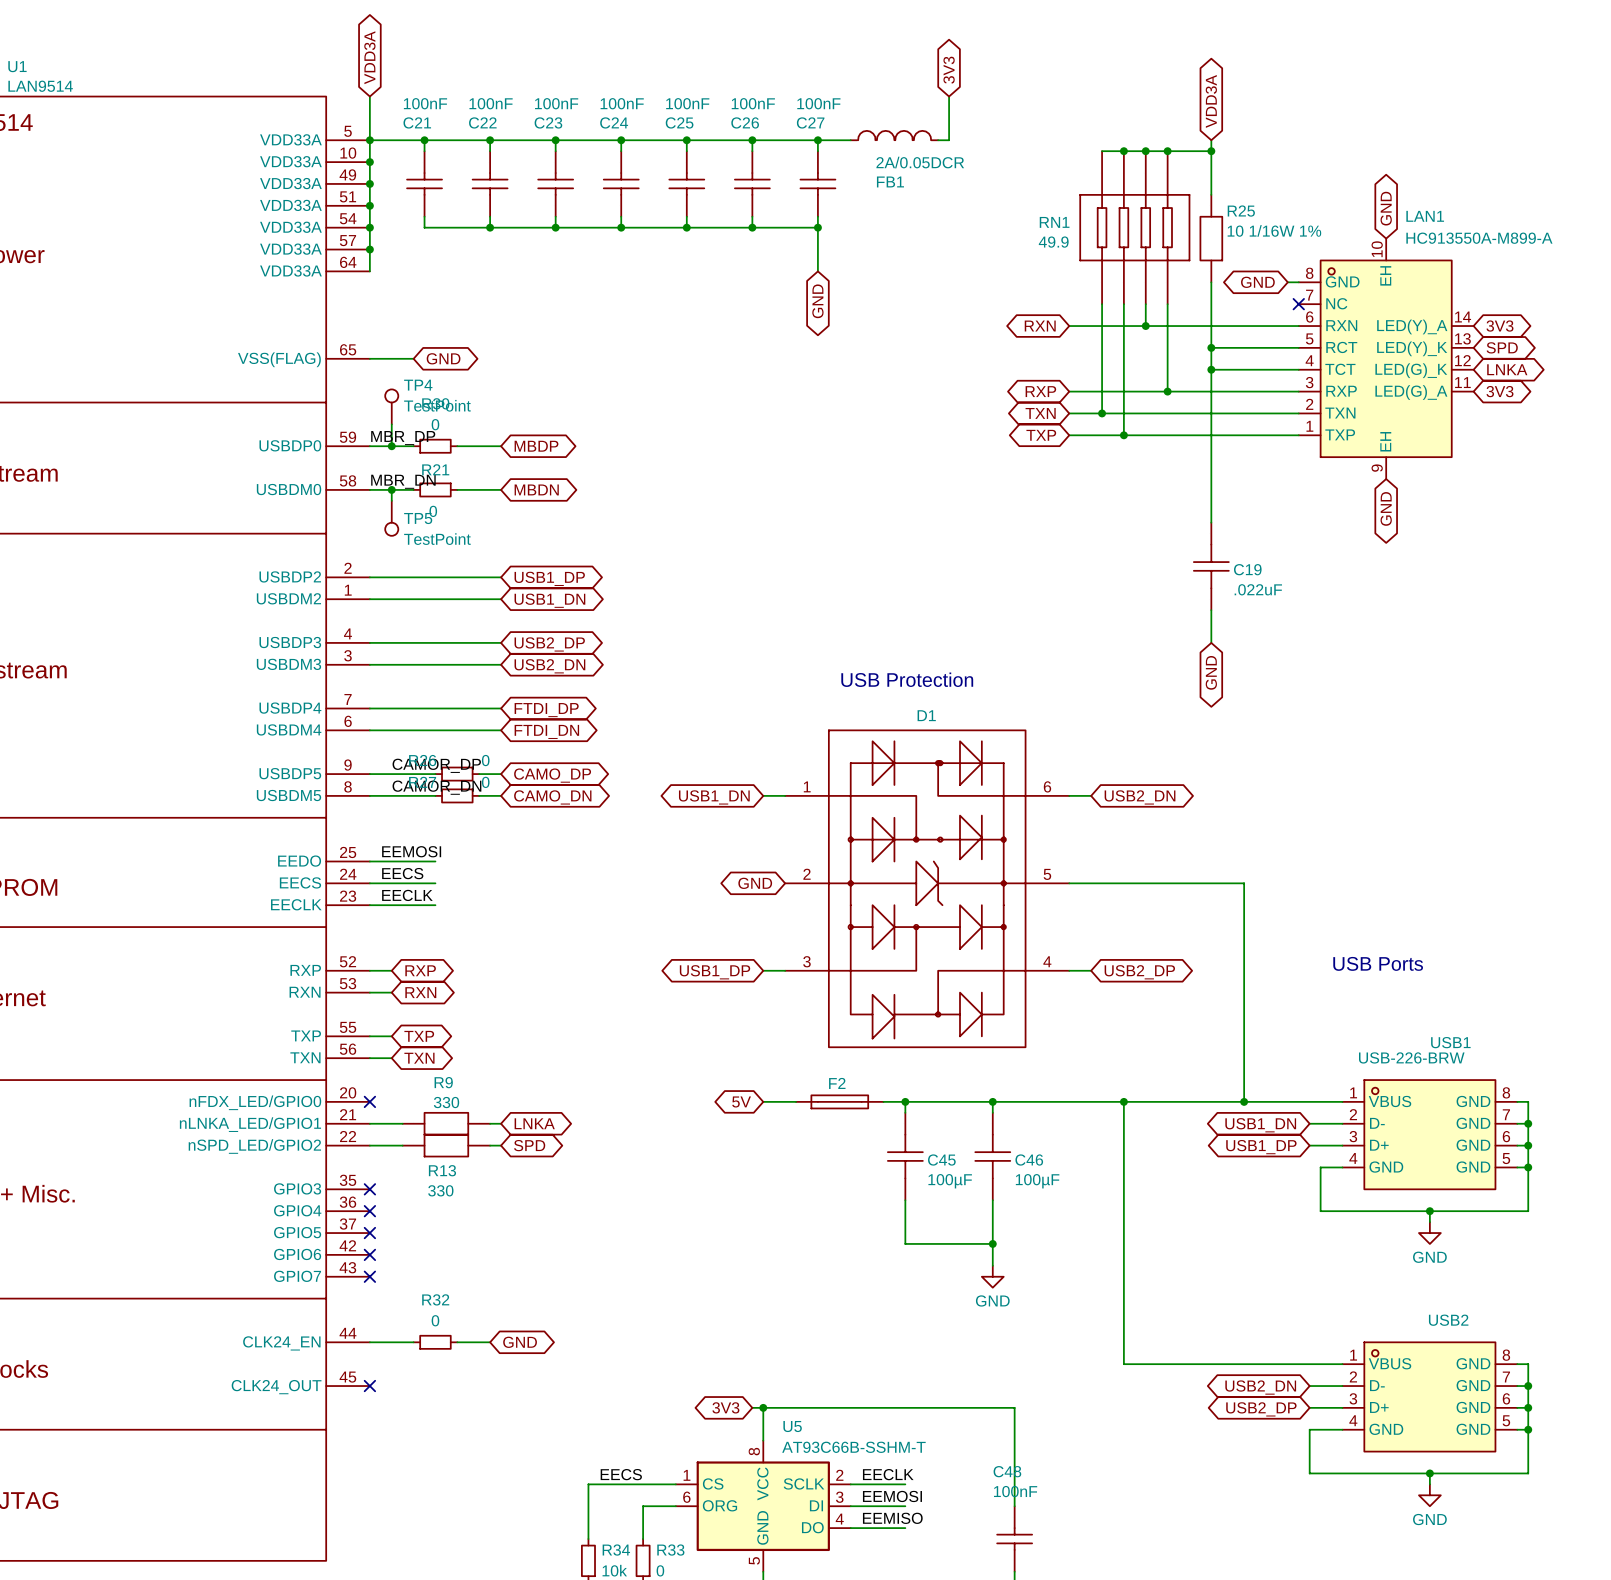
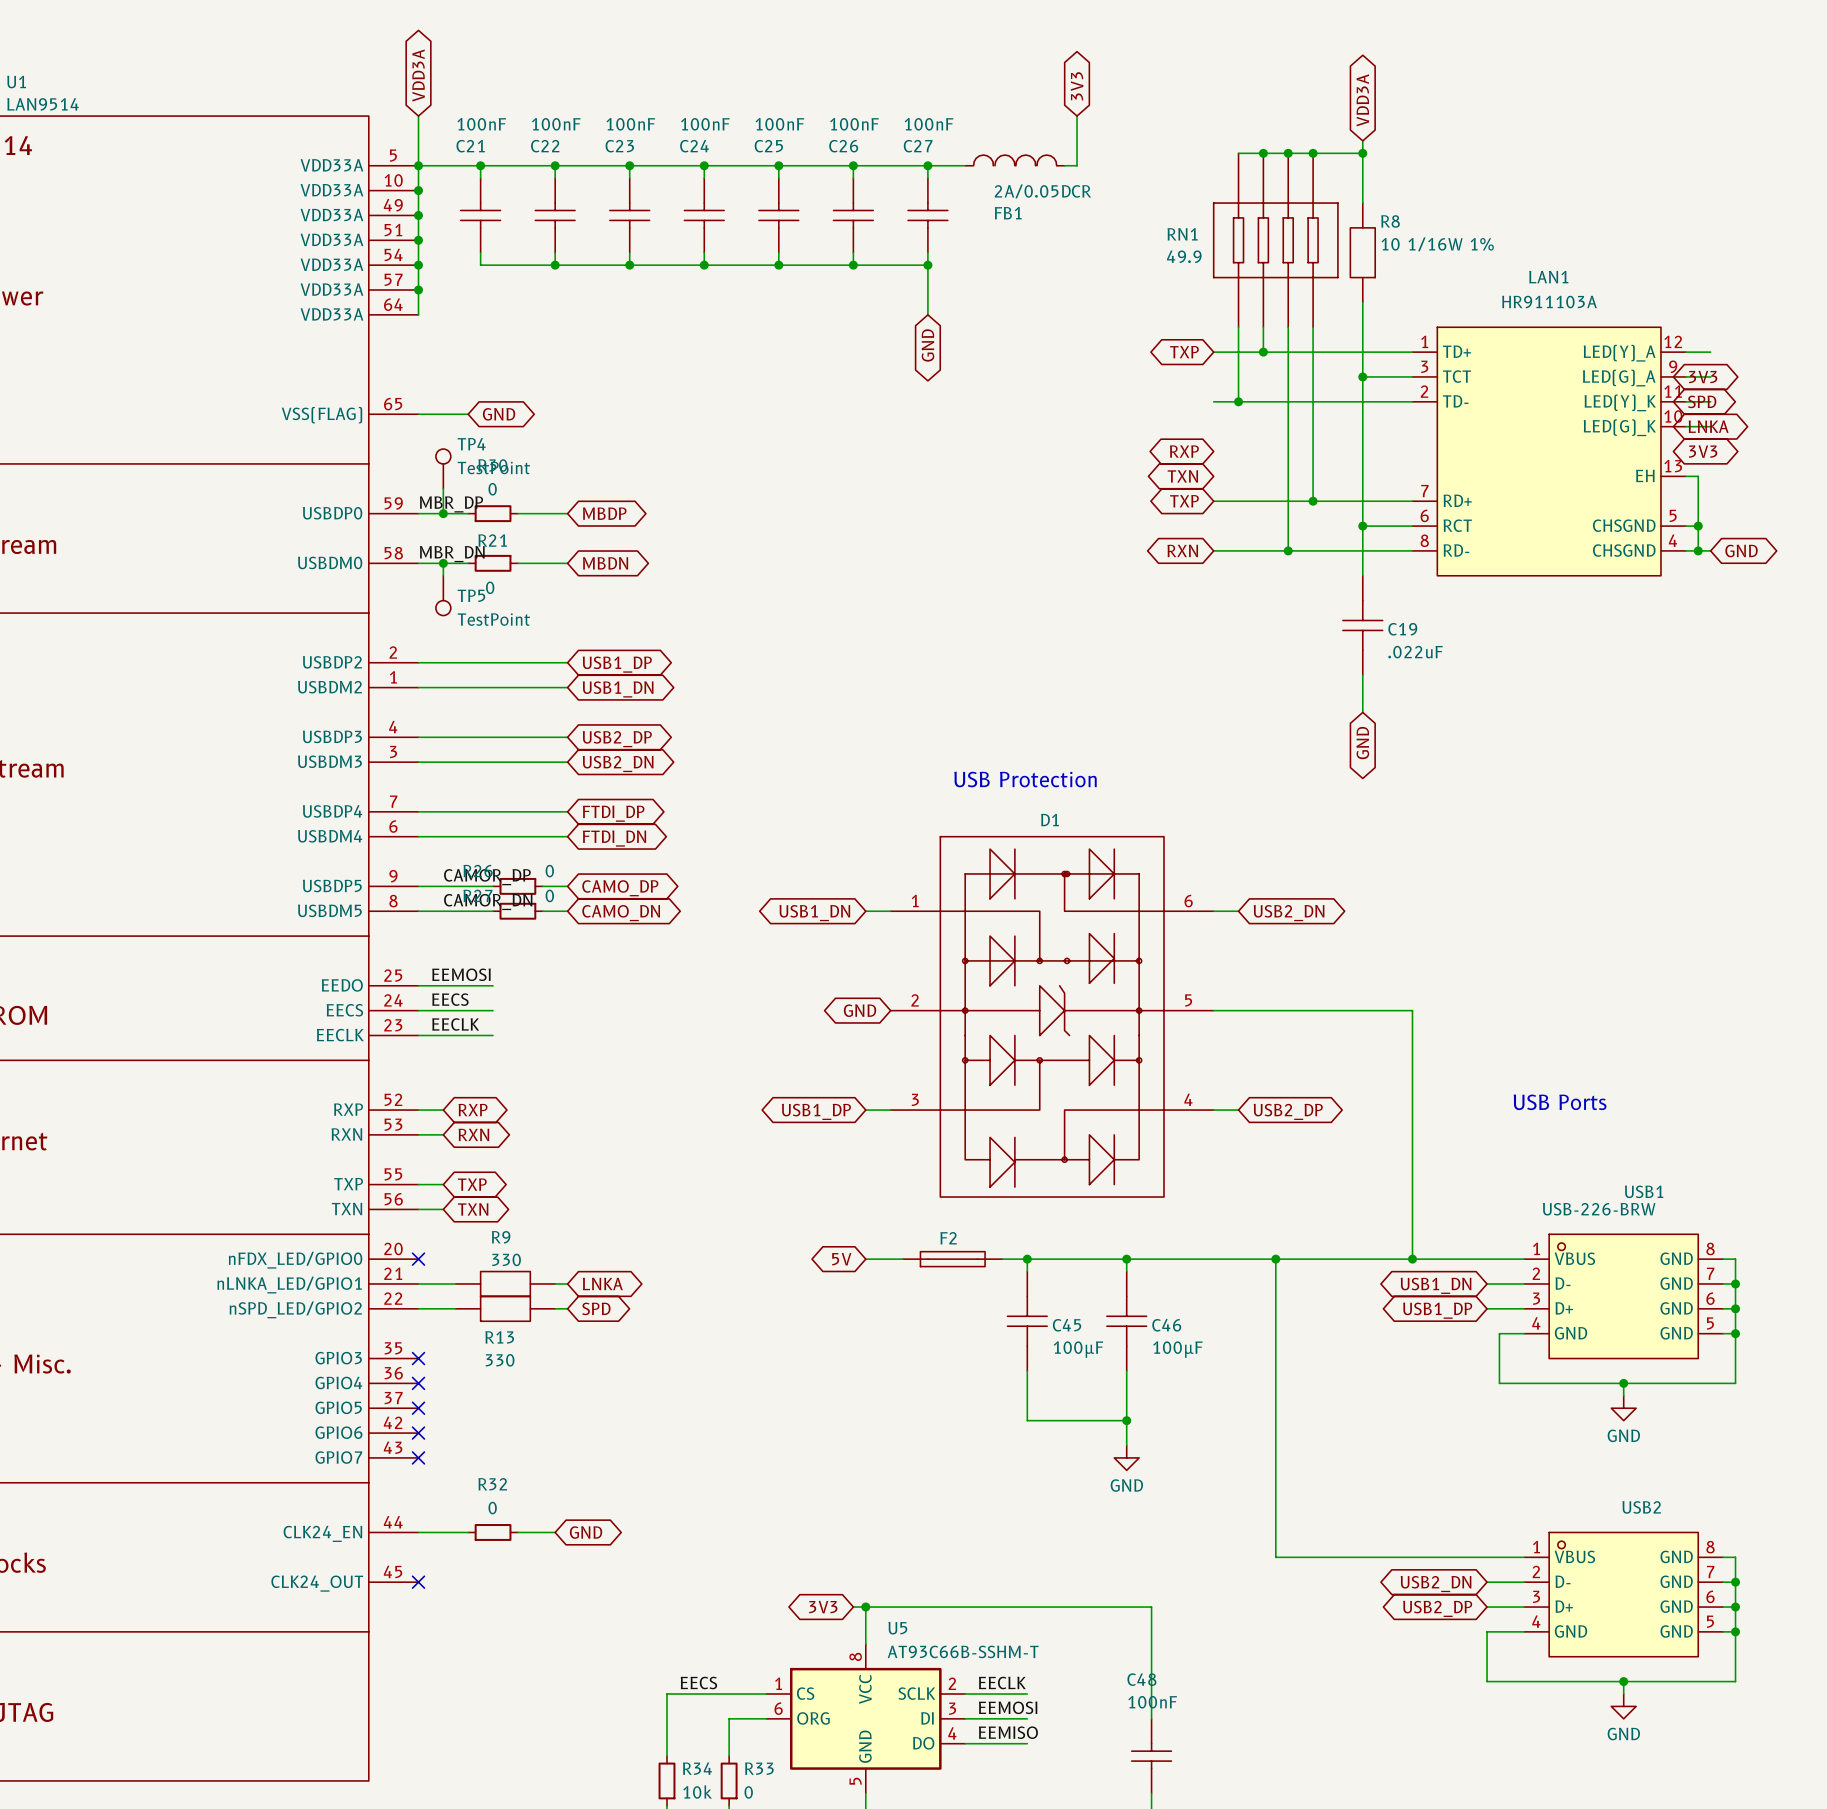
global label position: VDD3A (1211, 101) -> VDD3A (1362, 100)
junction: none -> (1263, 153)
junction: none -> (1288, 153)
junction: none -> (1313, 153)
junction: none -> (1362, 153)
wire: (1211, 140) (1211, 194) -> (1362, 140) (1362, 203)
wire: (1102, 151) (1211, 151) -> (1238, 153) (1362, 153)
junction: (1123, 151) -> none
junction: (1145, 151) -> none
junction: (1167, 151) -> none
junction: (1211, 151) -> none
global label: GND (1386, 208) -> none
R8: none -> 10 1/16W 1% (1362, 252)
LAN1 name position: LAN1 (1425, 216) -> LAN1 (1548, 277)
RN1 position: (1134, 227) -> (1275, 240)
R25: 10 1/16W 1% (1211, 238) -> none
LAN1 symbol: [1298, 238, 1474, 480] -> [1412, 327, 1686, 576]
LAN1 value: HC913550A-M899-A (1479, 238) -> HR911103A (1549, 302)
wire: none -> (1238, 327) (1238, 401)
wire: none -> (1288, 327) (1288, 550)
wire: none -> (1313, 327) (1313, 501)
wire: (1211, 282) (1211, 522) -> (1362, 302) (1362, 575)
global label: GND (1257, 282) -> none
global label: none -> TXP (1184, 352)
wire: none -> (1213, 352) (1412, 352)
wire: (1102, 304) (1102, 413) -> none
junction: none -> (1263, 352)
wire: (1123, 304) (1123, 435) -> none
wire: (1145, 304) (1145, 326) -> (1263, 327) (1263, 352)
wire: (1167, 304) (1167, 391) -> none
no-connect mark: (1298, 304) -> none
wire: none -> (1685, 352) (1710, 352)
global label position: RXN (1040, 326) -> RXN (1182, 550)
wire: (1069, 326) (1200, 326) -> none
junction: (1145, 326) -> none
junction: none -> (1362, 376)
wire: none -> (1685, 376) (1710, 376)
wire: none -> (1213, 401) (1375, 401)
junction: none -> (1238, 401)
junction: (1211, 347) -> none
wire: none -> (1685, 401) (1710, 401)
wire: (1211, 369) (1298, 369) -> none
junction: (1211, 369) -> none
wire: none -> (1685, 426) (1710, 426)
wire: (1069, 391) (1298, 391) -> none
junction: (1167, 391) -> none
wire: (1069, 413) (1298, 413) -> none
junction: (1102, 413) -> none
wire: none -> (1685, 476) (1698, 476) (1698, 550)
junction: (1123, 435) -> none
junction: none -> (1313, 501)
wire: none -> (1362, 526) (1412, 526)
junction: none -> (1362, 526)
wire: none -> (1685, 526) (1698, 526)
junction: none -> (1698, 526)
wire: none -> (1213, 550) (1412, 550)
junction: none -> (1288, 550)
wire: none -> (1685, 550) (1710, 550)
junction: none -> (1698, 550)
global label: none -> GND (1741, 550)
global label: GND (1386, 508) -> none
C19 position: (1211, 566) -> (1362, 625)
wire: (1211, 610) (1211, 642) -> (1362, 675) (1362, 712)
global label position: GND (1211, 672) -> GND (1362, 743)

